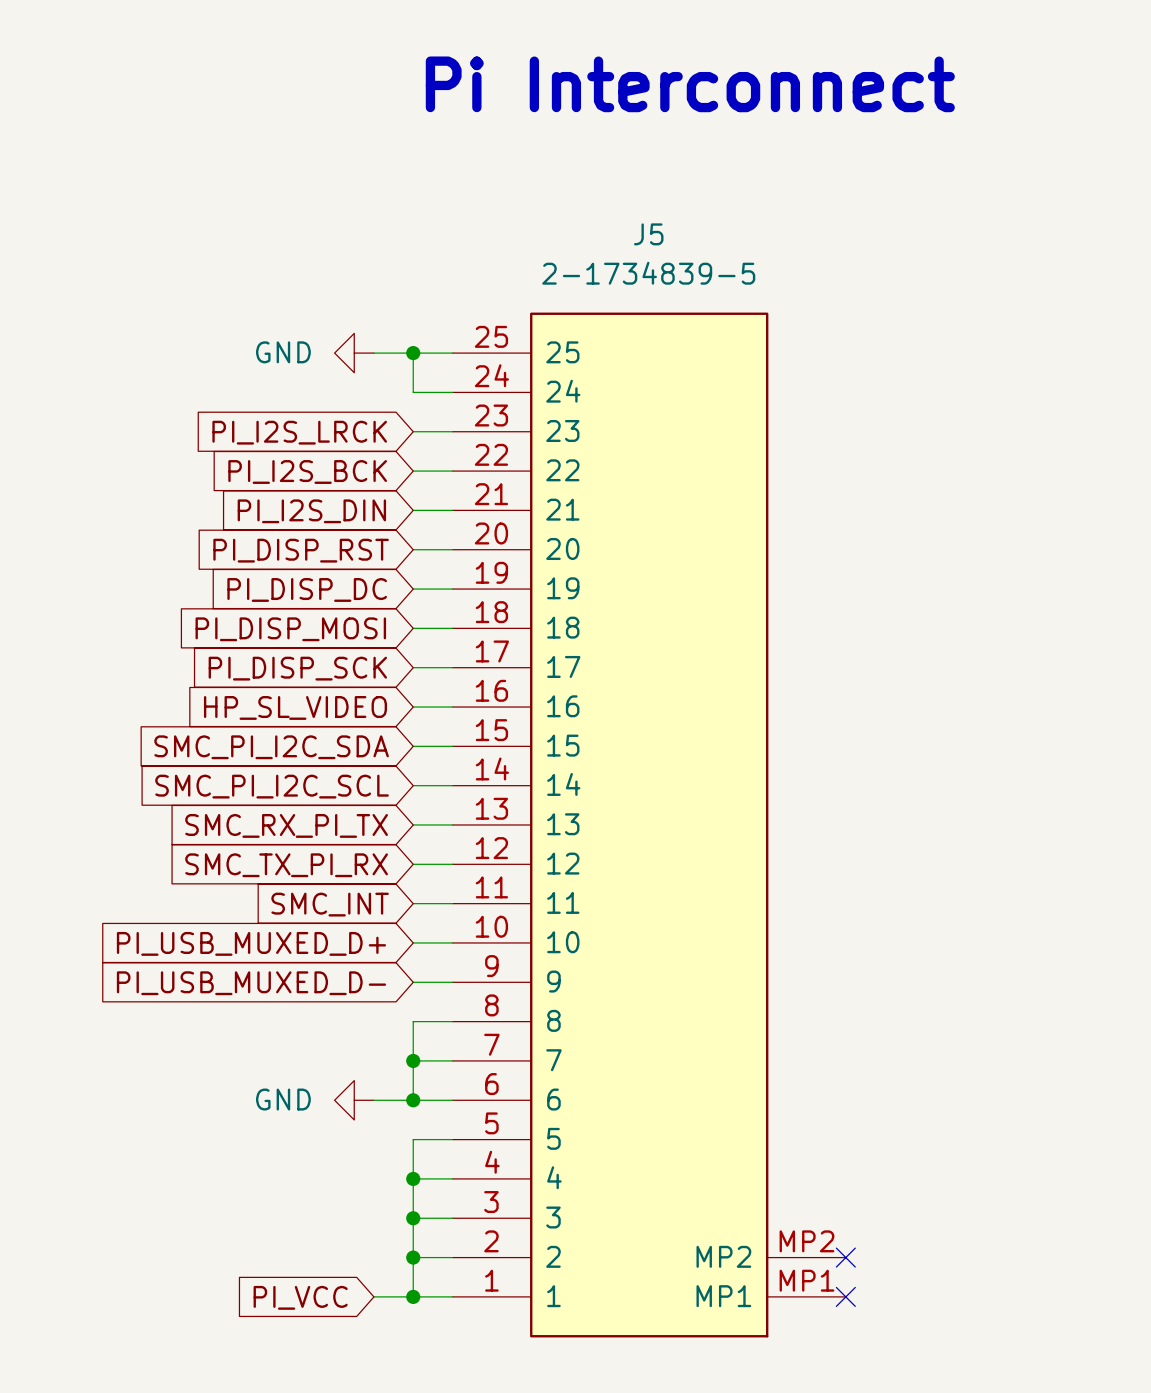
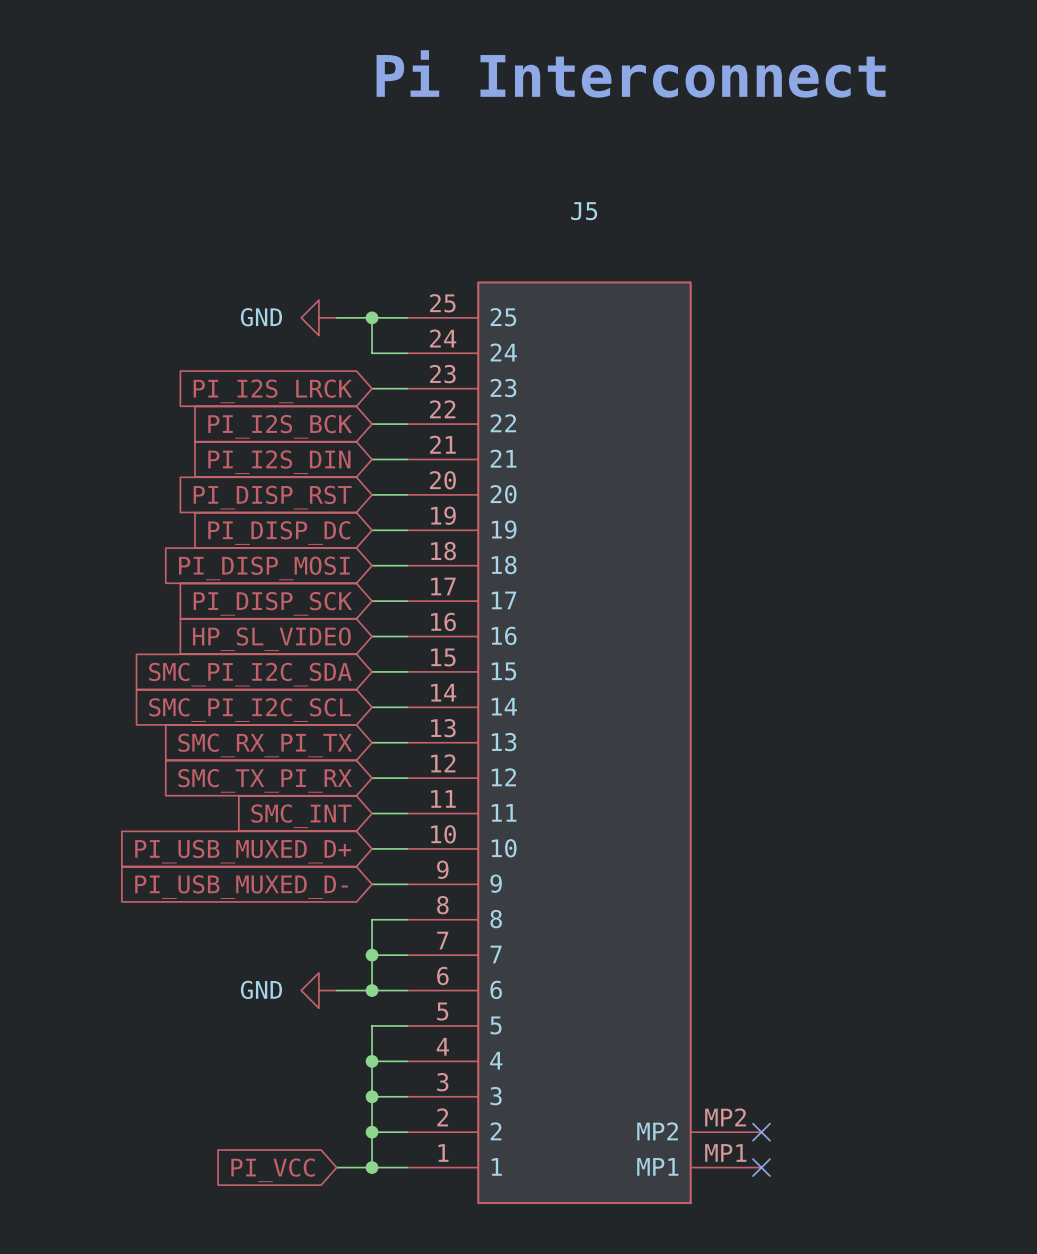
J5 value: 2-1734839-5 (648, 273) -> none

